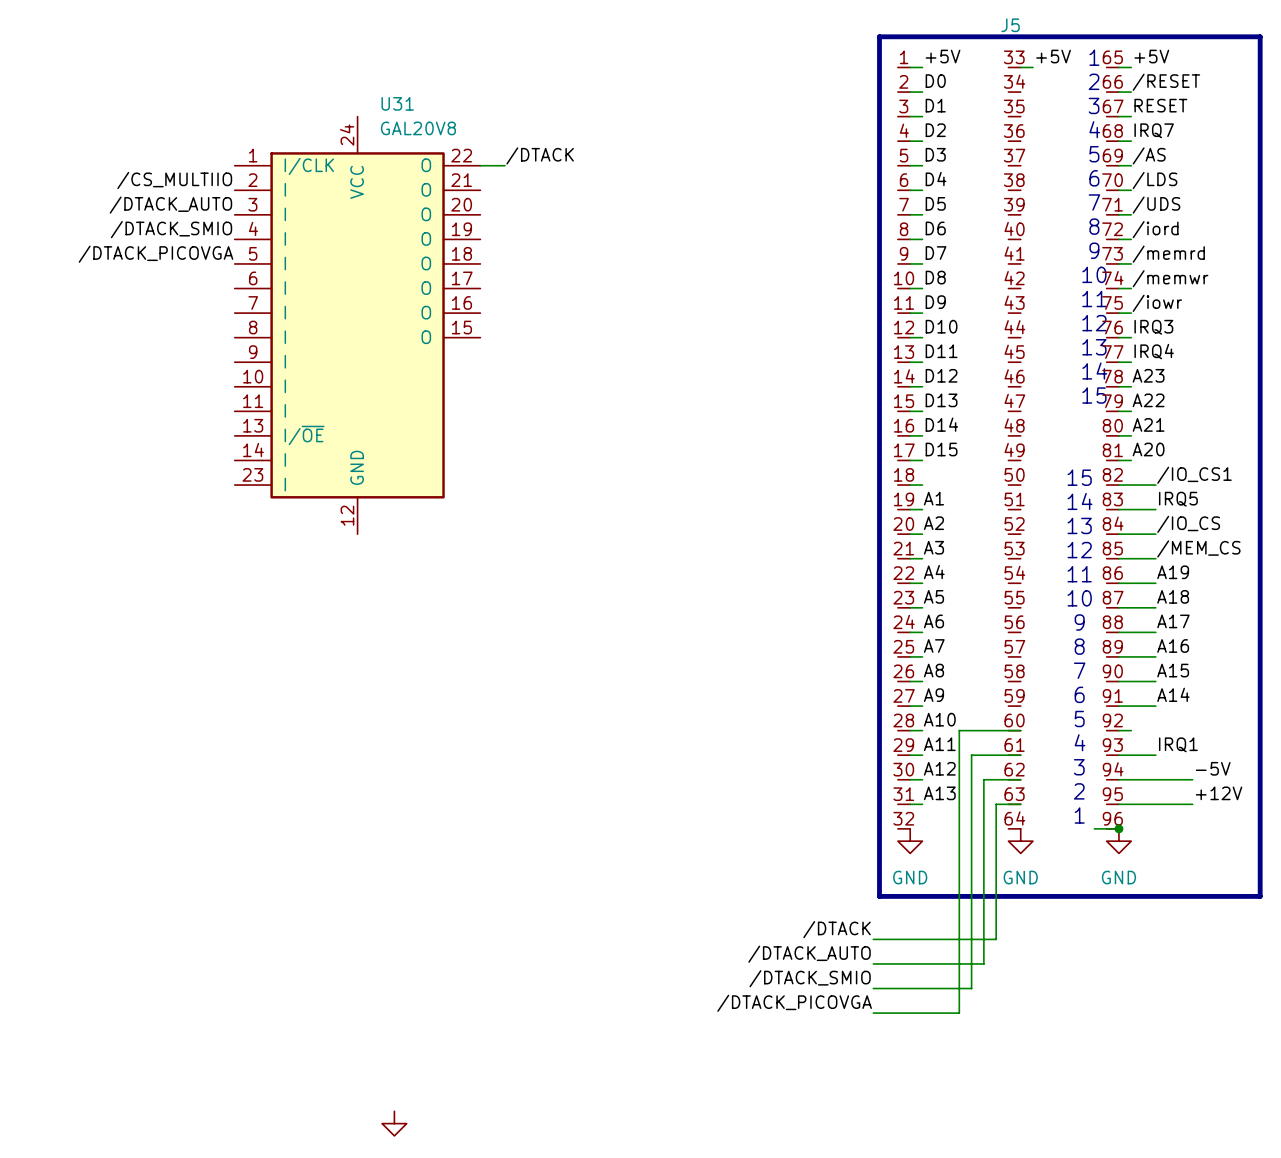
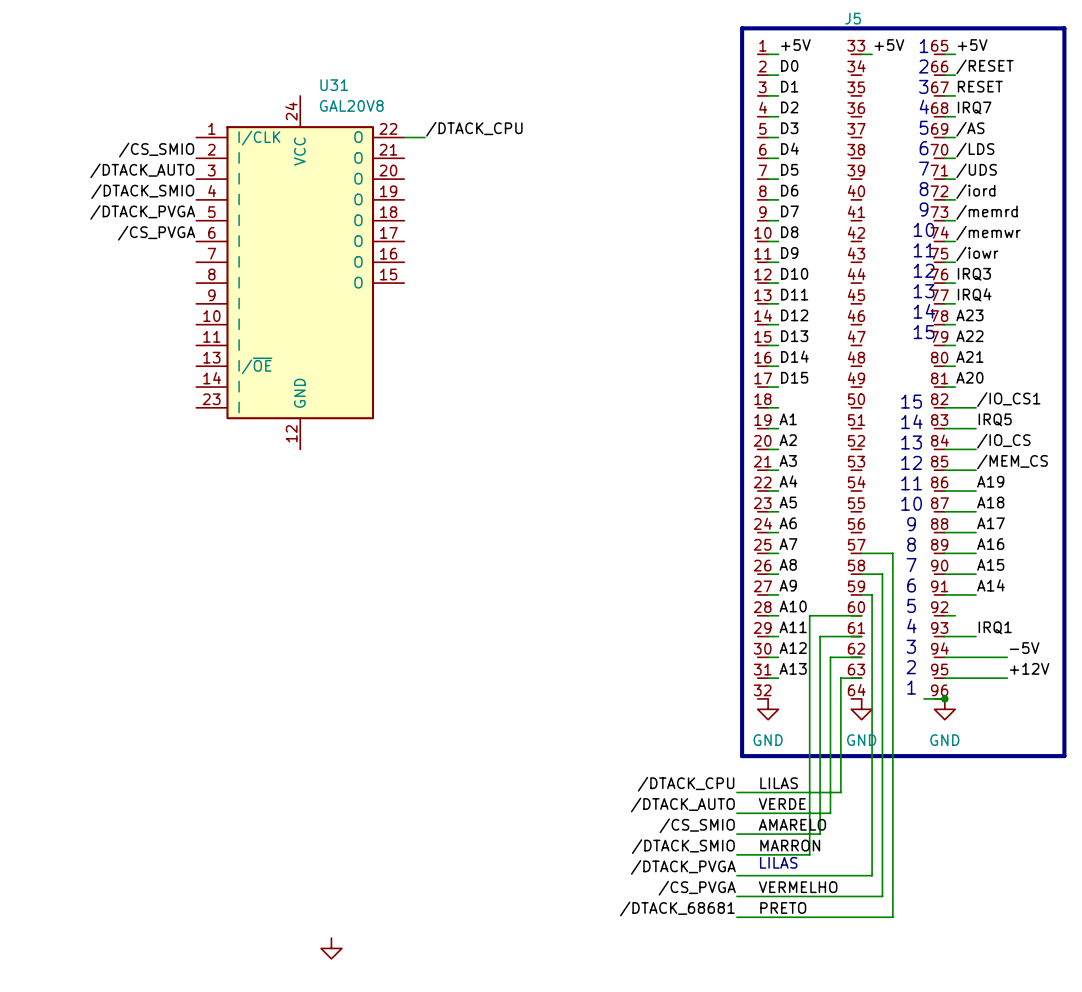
label: /DTACK (540, 155) -> /DTACK_CPU (474, 129)
label: /CS_MULTIIO (174, 180) -> /CS_SMIO (156, 150)
label: /DTACK_PICOVGA (156, 254) -> /DTACK_PVGA (142, 212)
label: none -> /CS_PVGA (156, 233)
wire: none -> (861, 553) (892, 553) (892, 917) (736, 917)
wire: none -> (861, 574) (882, 574) (882, 896) (736, 896)
wire: none -> (861, 594) (872, 594) (872, 875) (736, 875)
label: none -> LILAS (779, 783)
label: /DTACK (837, 929) -> /DTACK_CPU (686, 784)
label: none -> VERDE (782, 804)
label: none -> AMARELO (792, 824)
label: /DTACK_SMIO (810, 978) -> /CS_SMIO (697, 825)
label: none -> MARRON (790, 845)
label: /DTACK_PICOVGA (794, 1003) -> /DTACK_SMIO (683, 846)
text: none -> LILAS (778, 862)
label: none -> /DTACK_PVGA (683, 867)
label: none -> VERMELHO (798, 887)
label: none -> /CS_PVGA (697, 888)
label: none -> PRETO (783, 907)
label: none -> /DTACK_68681 (677, 908)

